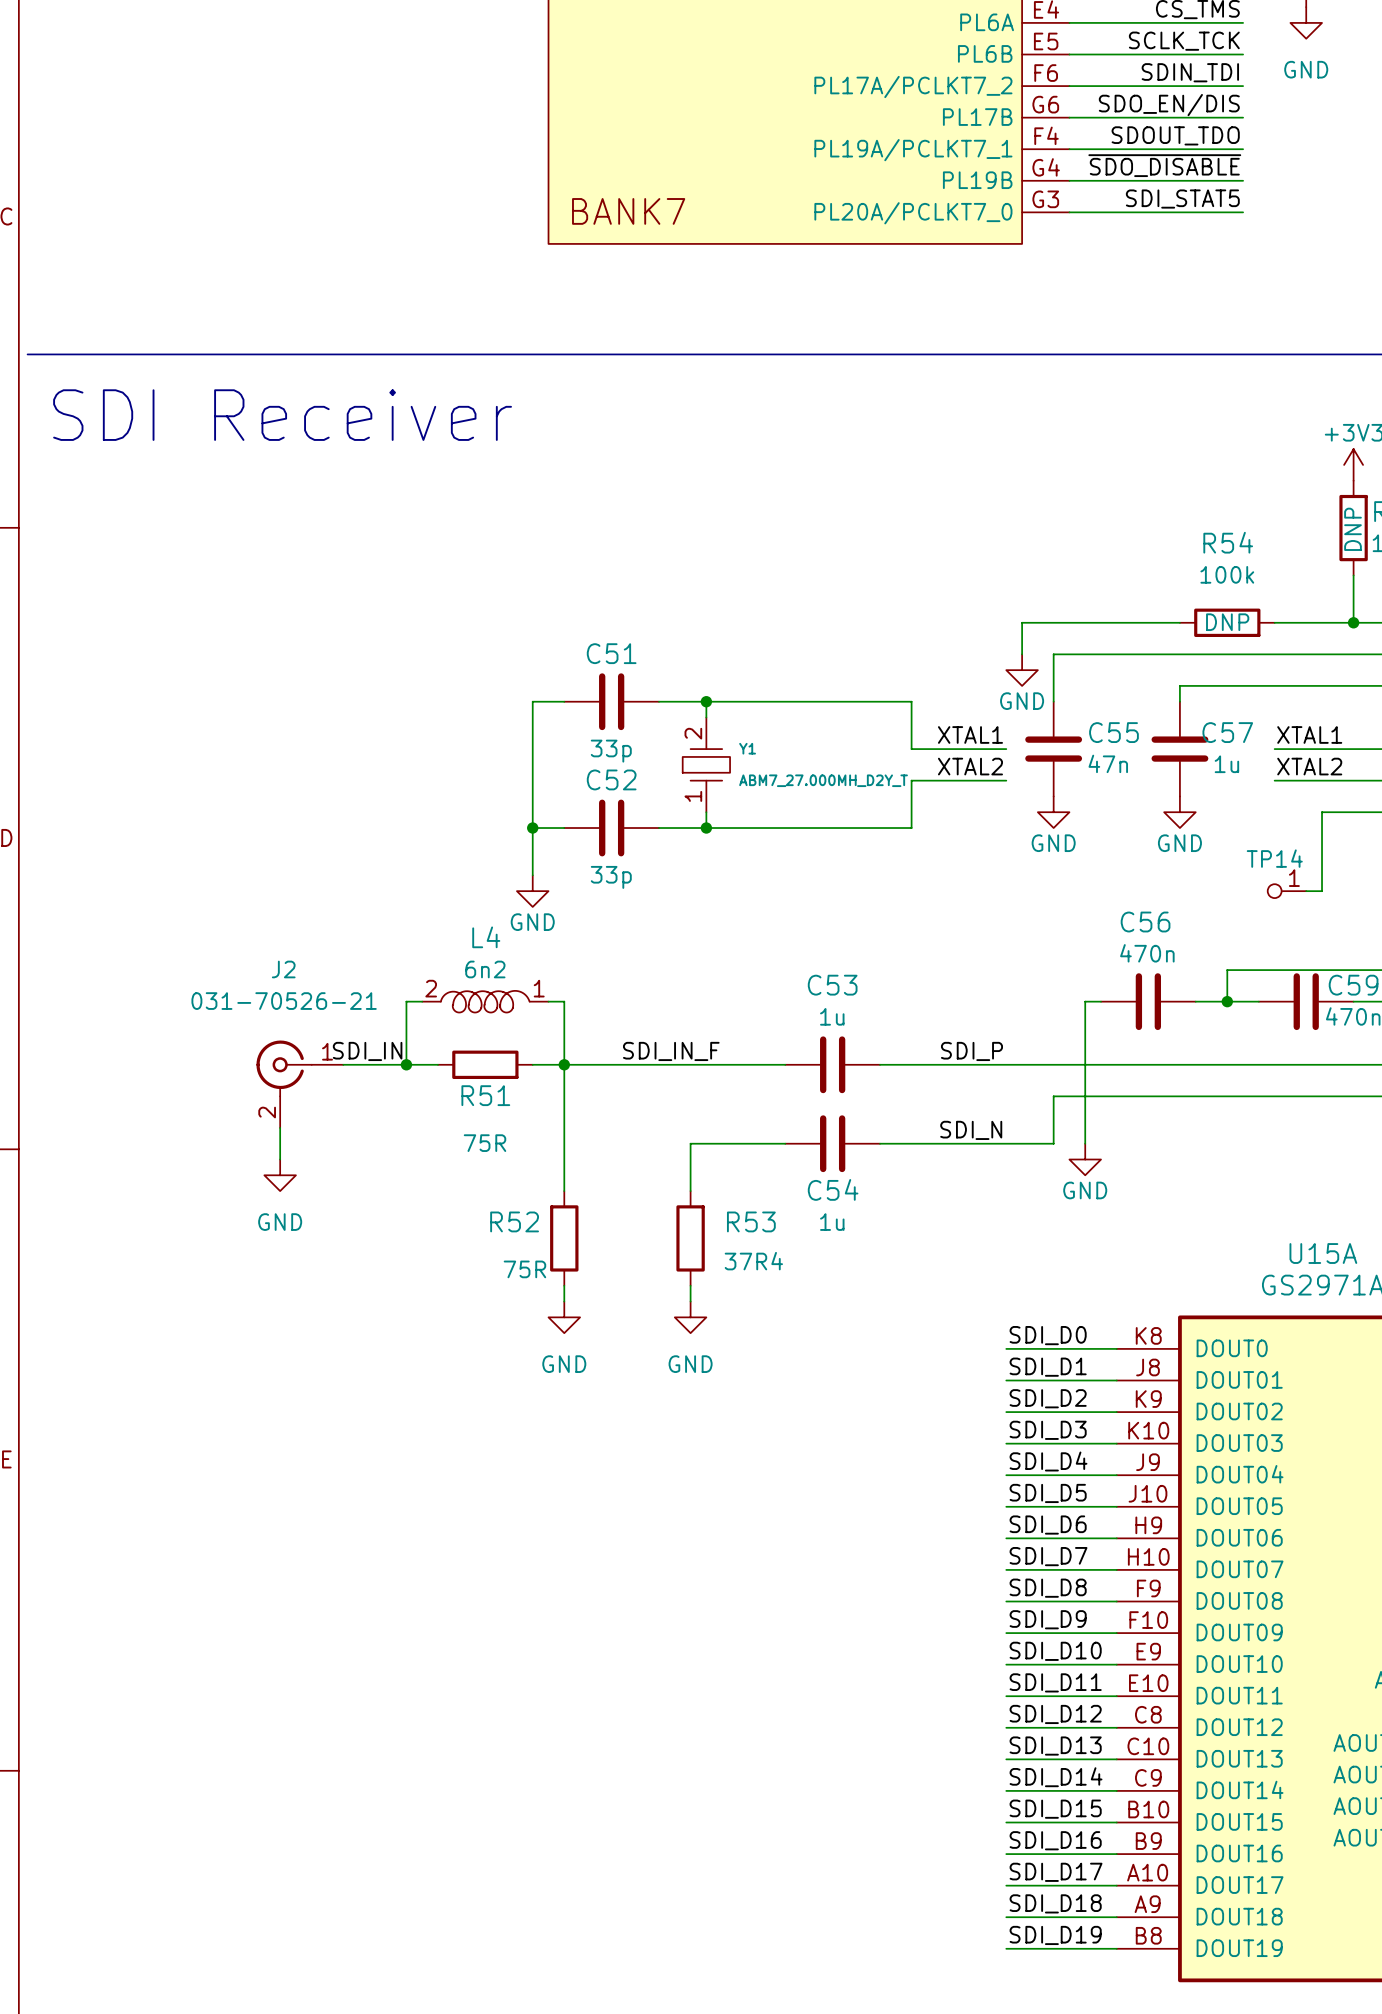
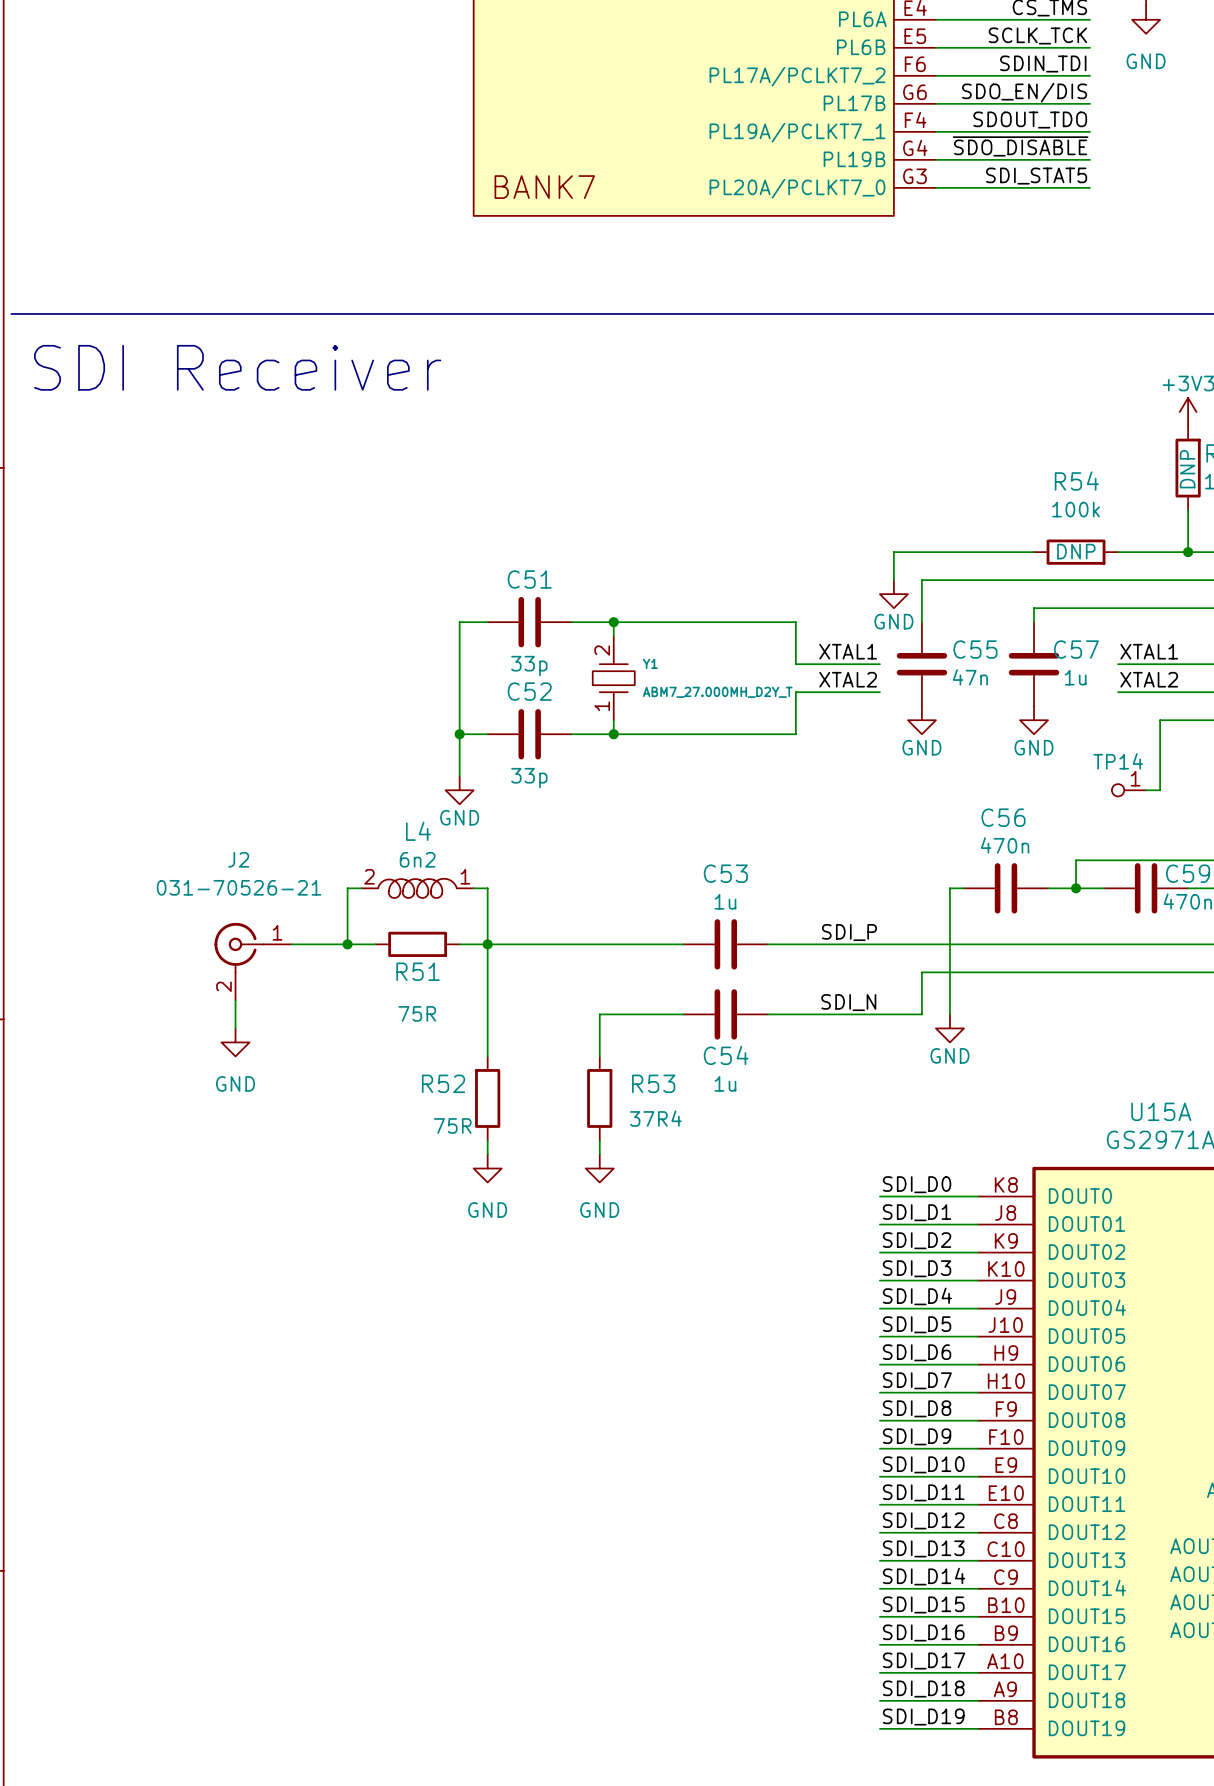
label: SDI_IN (367, 1051) -> none
label: SDI_IN_F (671, 1051) -> none

